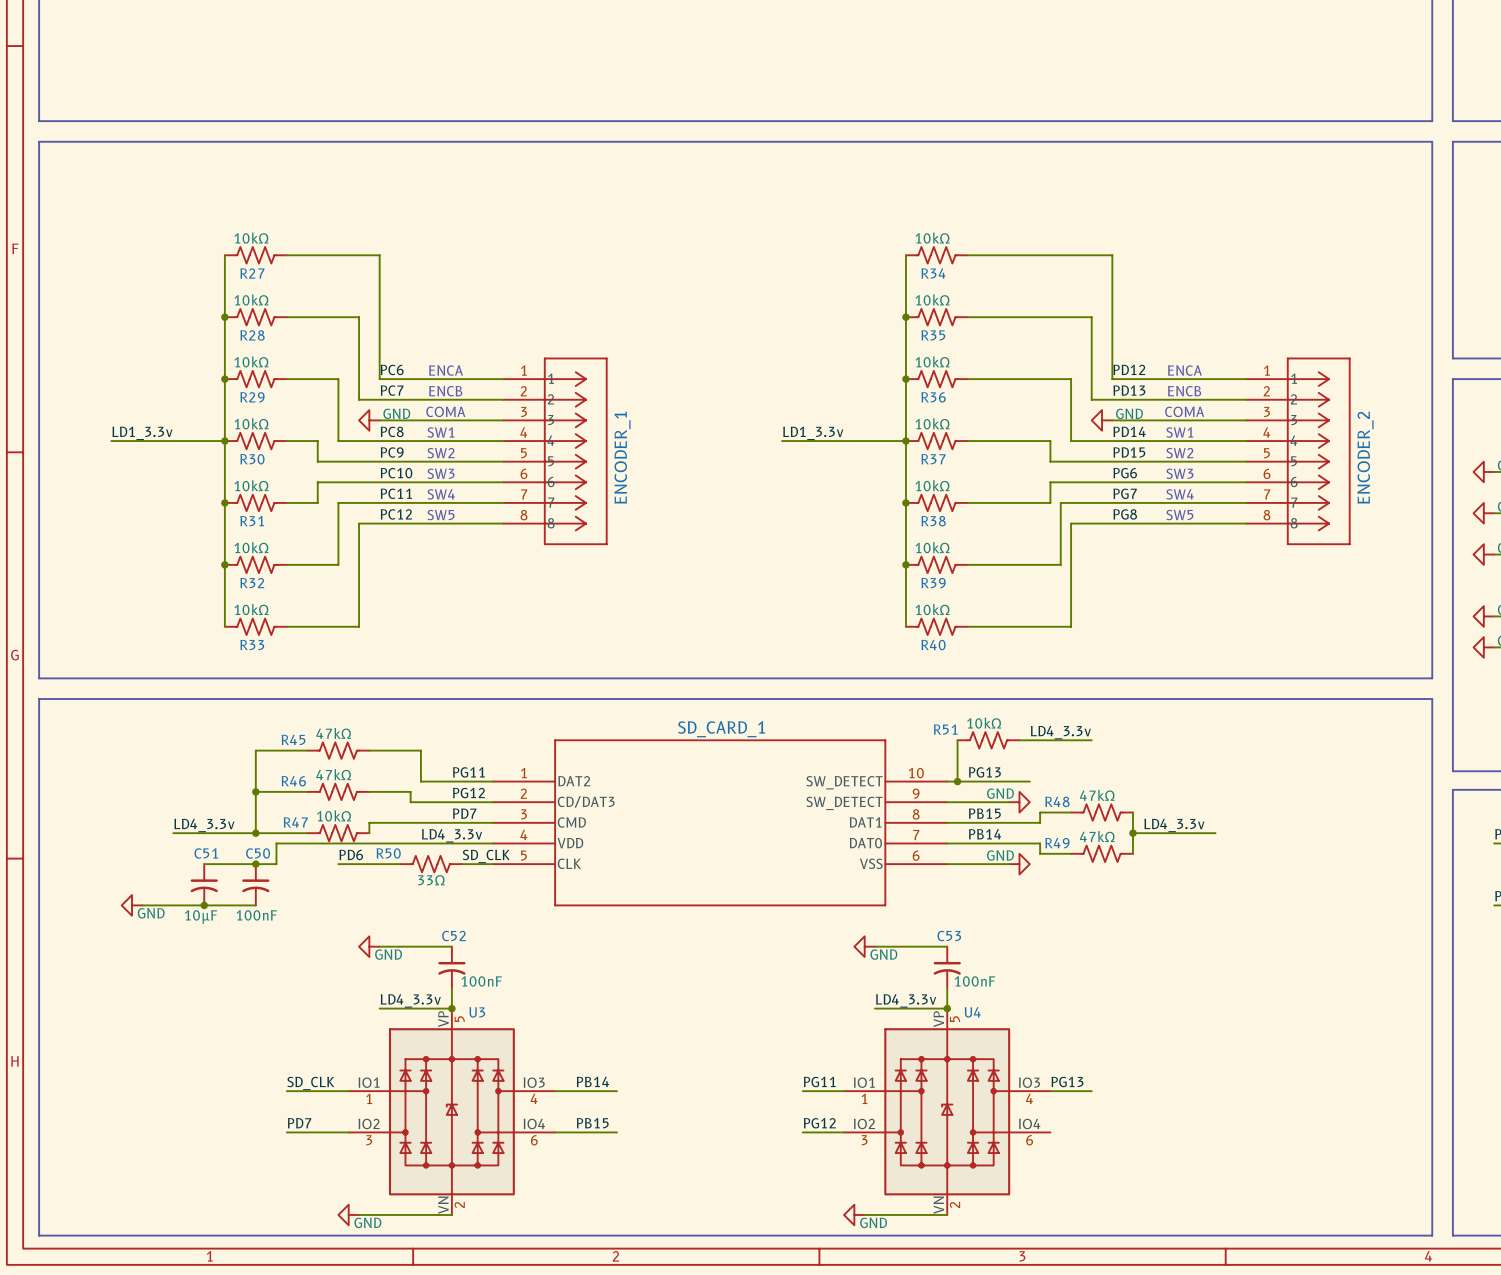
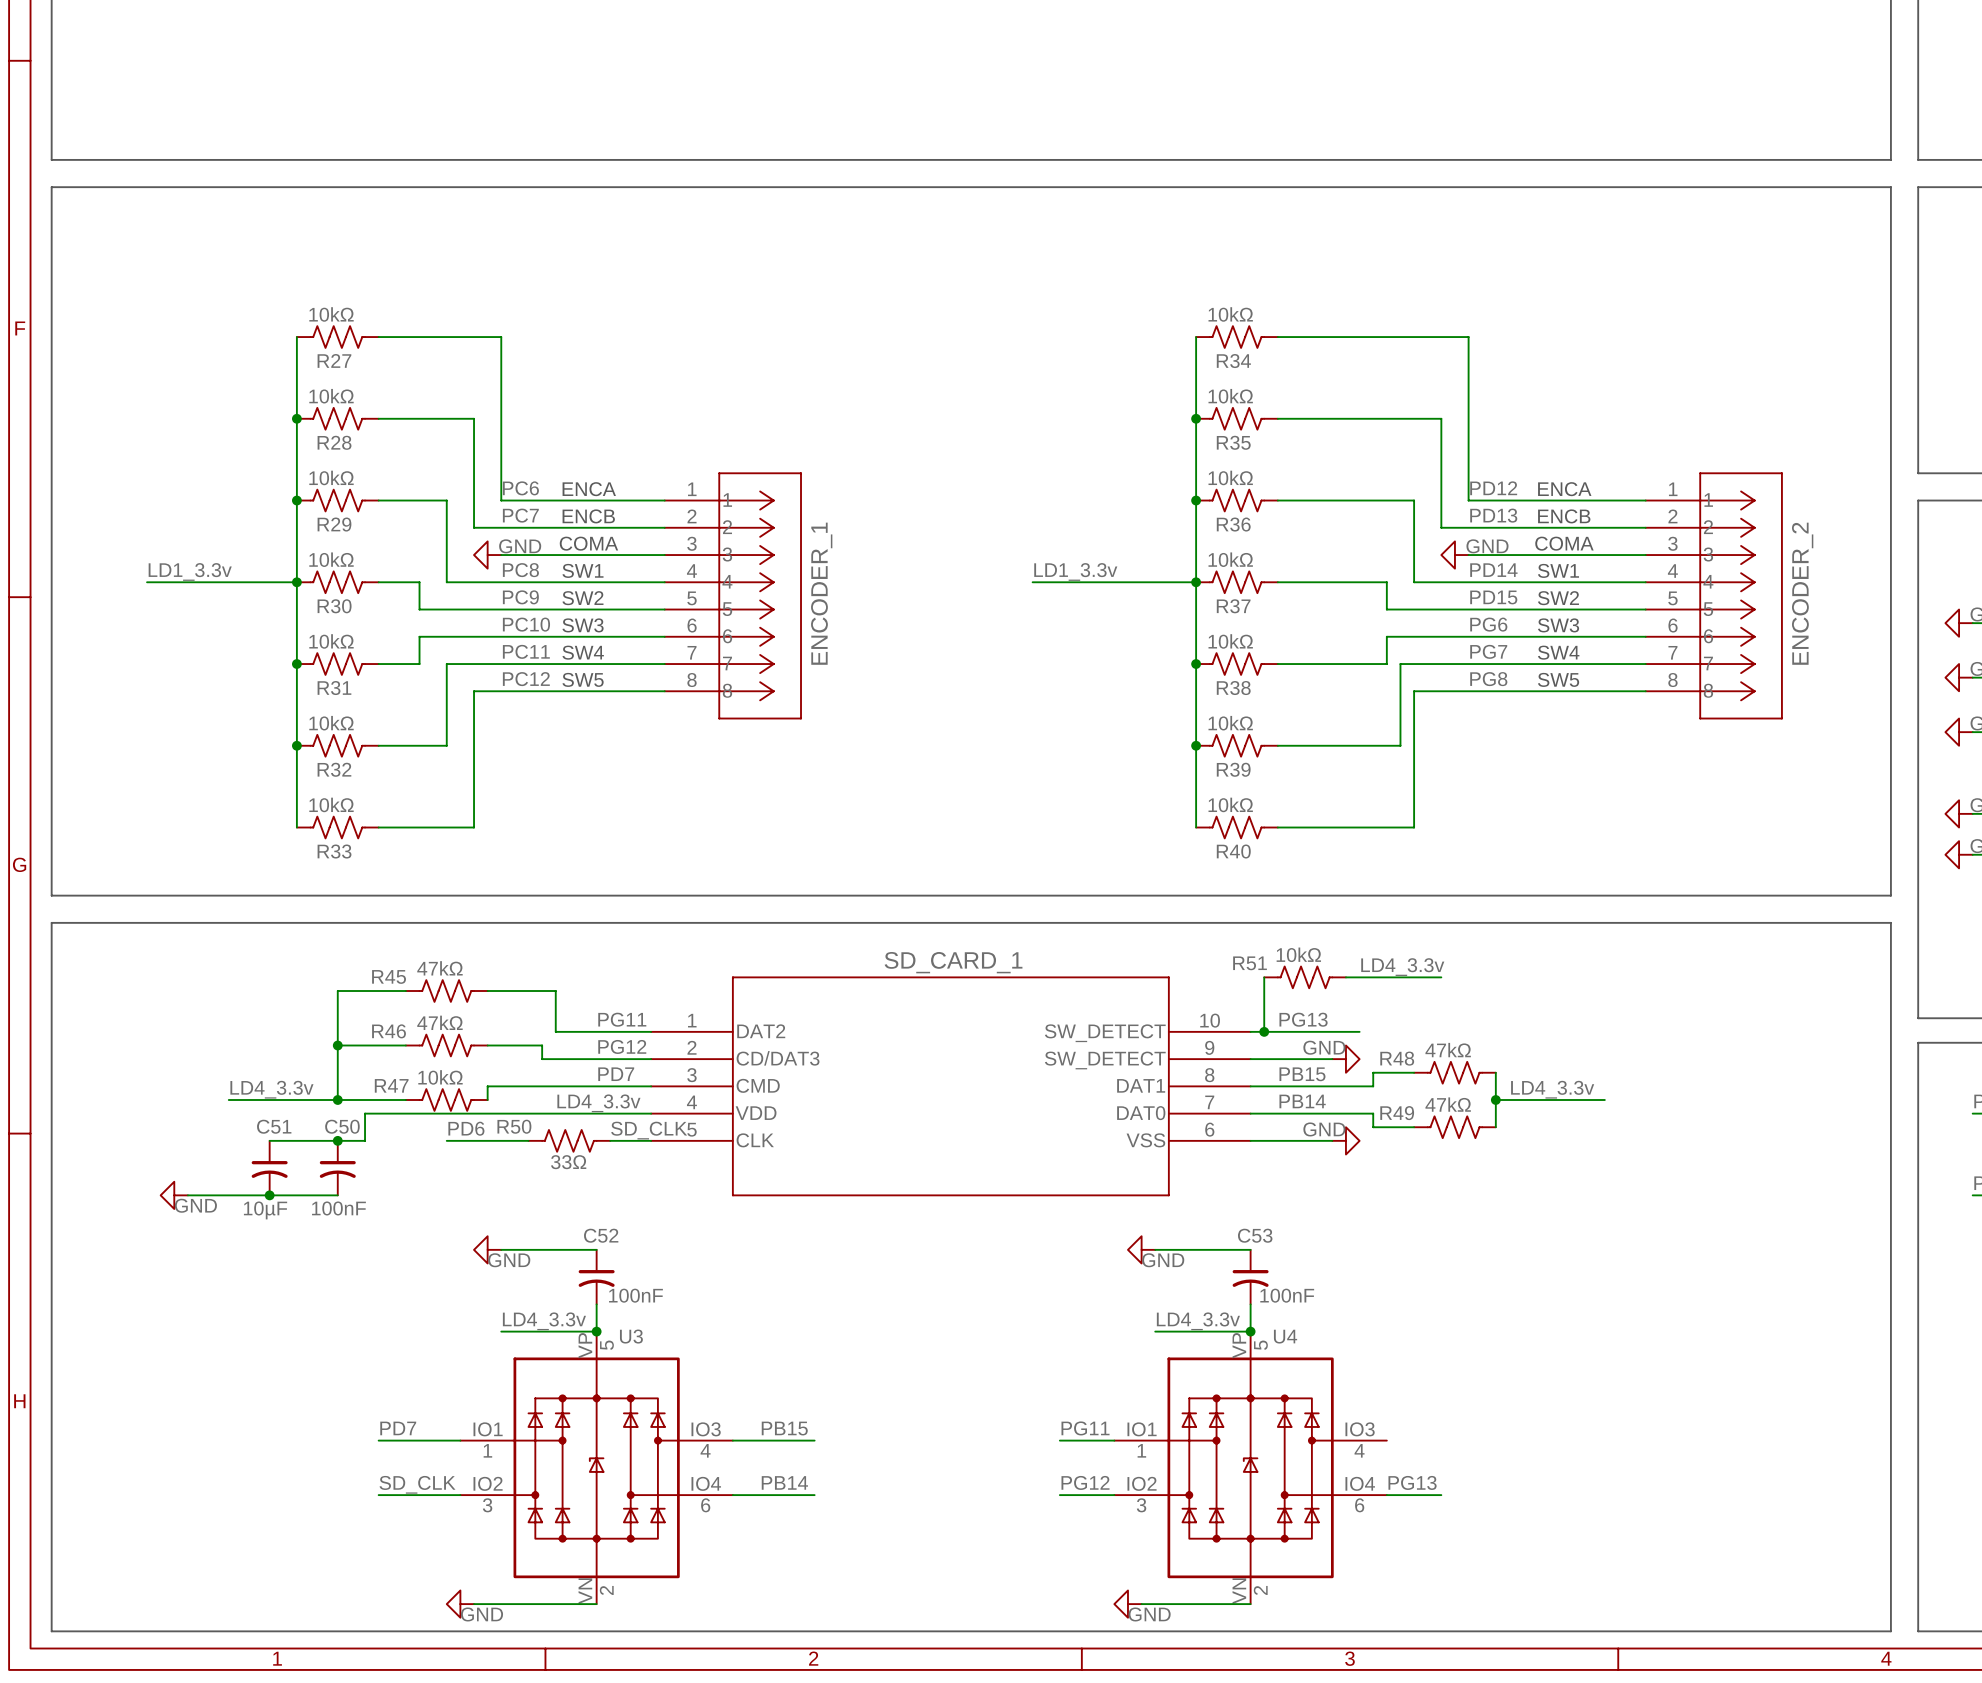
label: PB14 (592, 1081) -> PB15 (784, 1428)
label position: PG13 (1067, 1082) -> PG13 (1412, 1482)
label: SD_CLK (310, 1083) -> PD7 (398, 1428)
wire: (1050, 1091) (1091, 1091) -> (1386, 1495) (1441, 1495)
label: PD7 (299, 1123) -> SD_CLK (417, 1484)
label: PB15 (592, 1123) -> PB14 (784, 1482)

